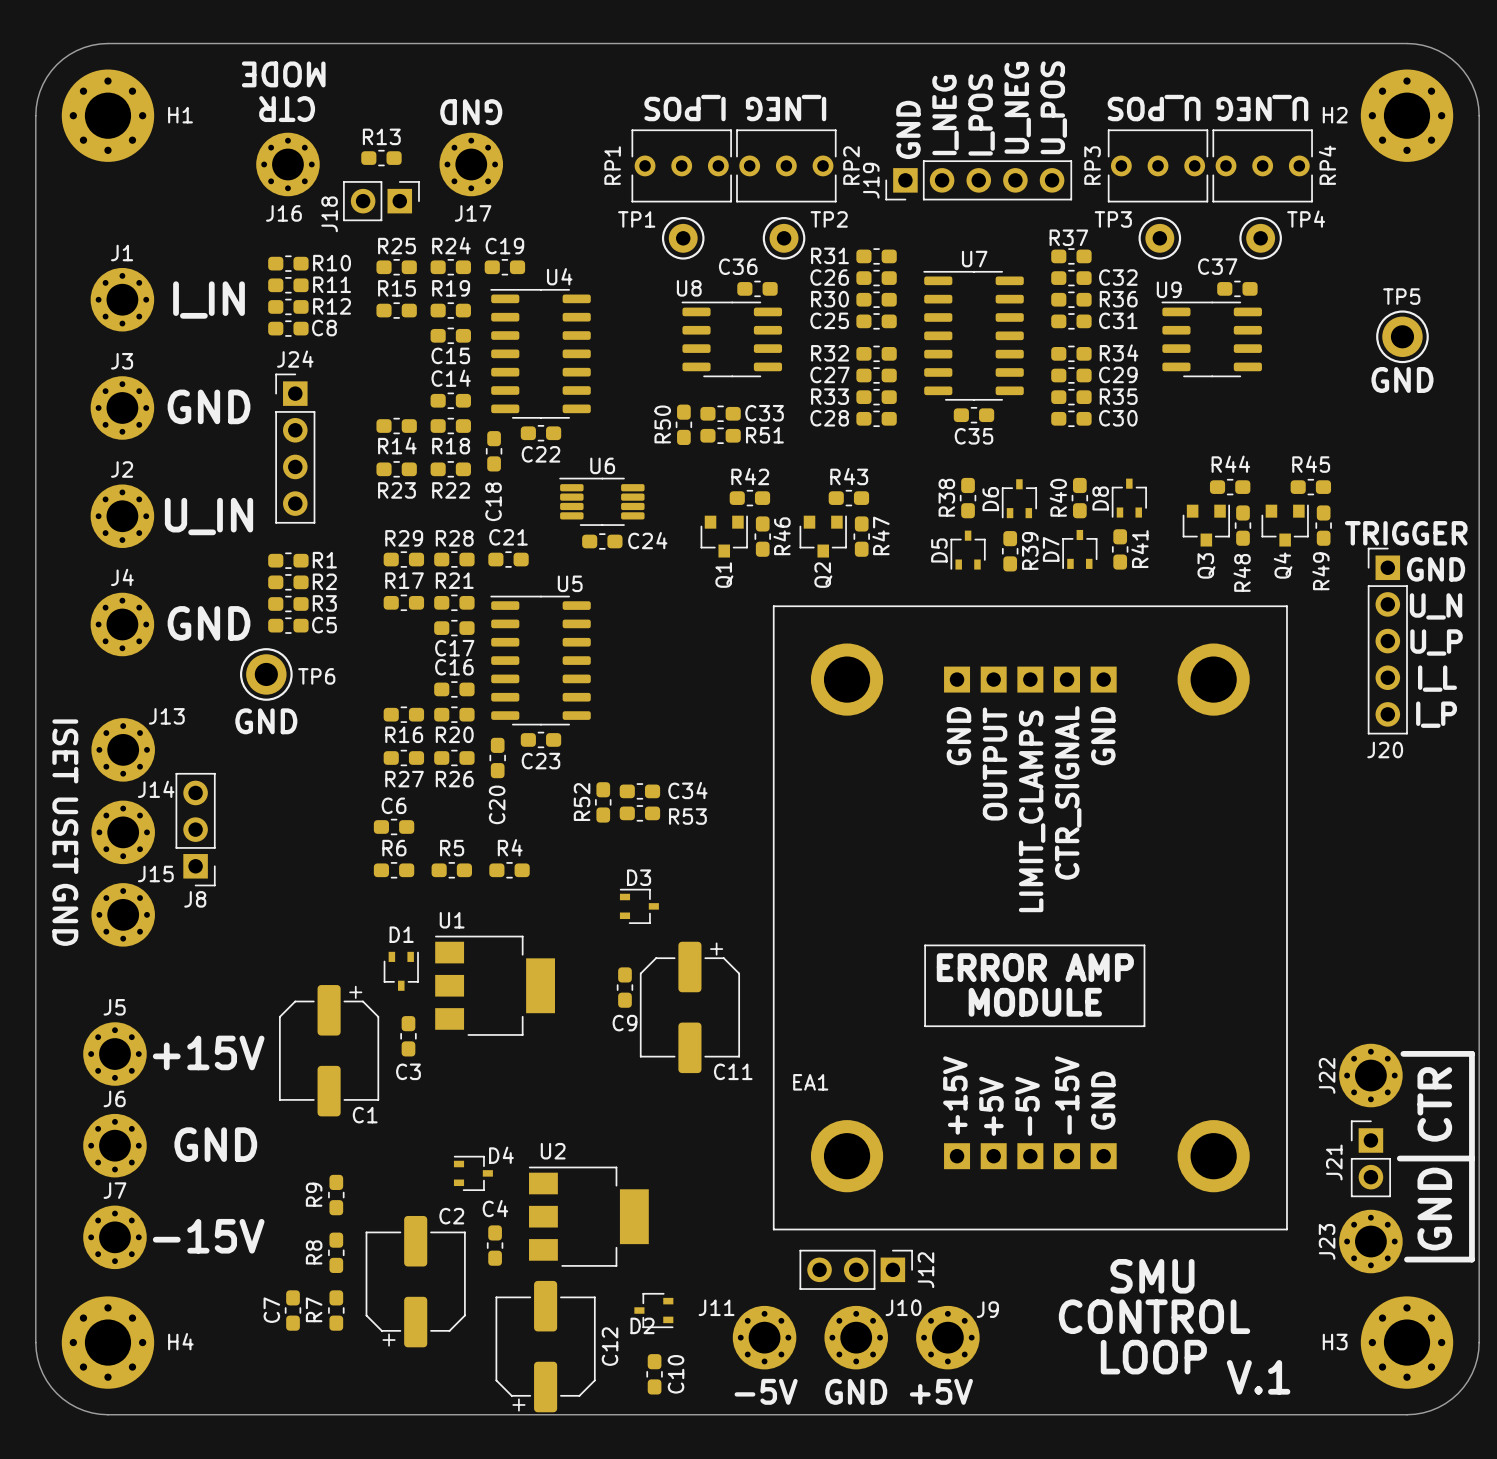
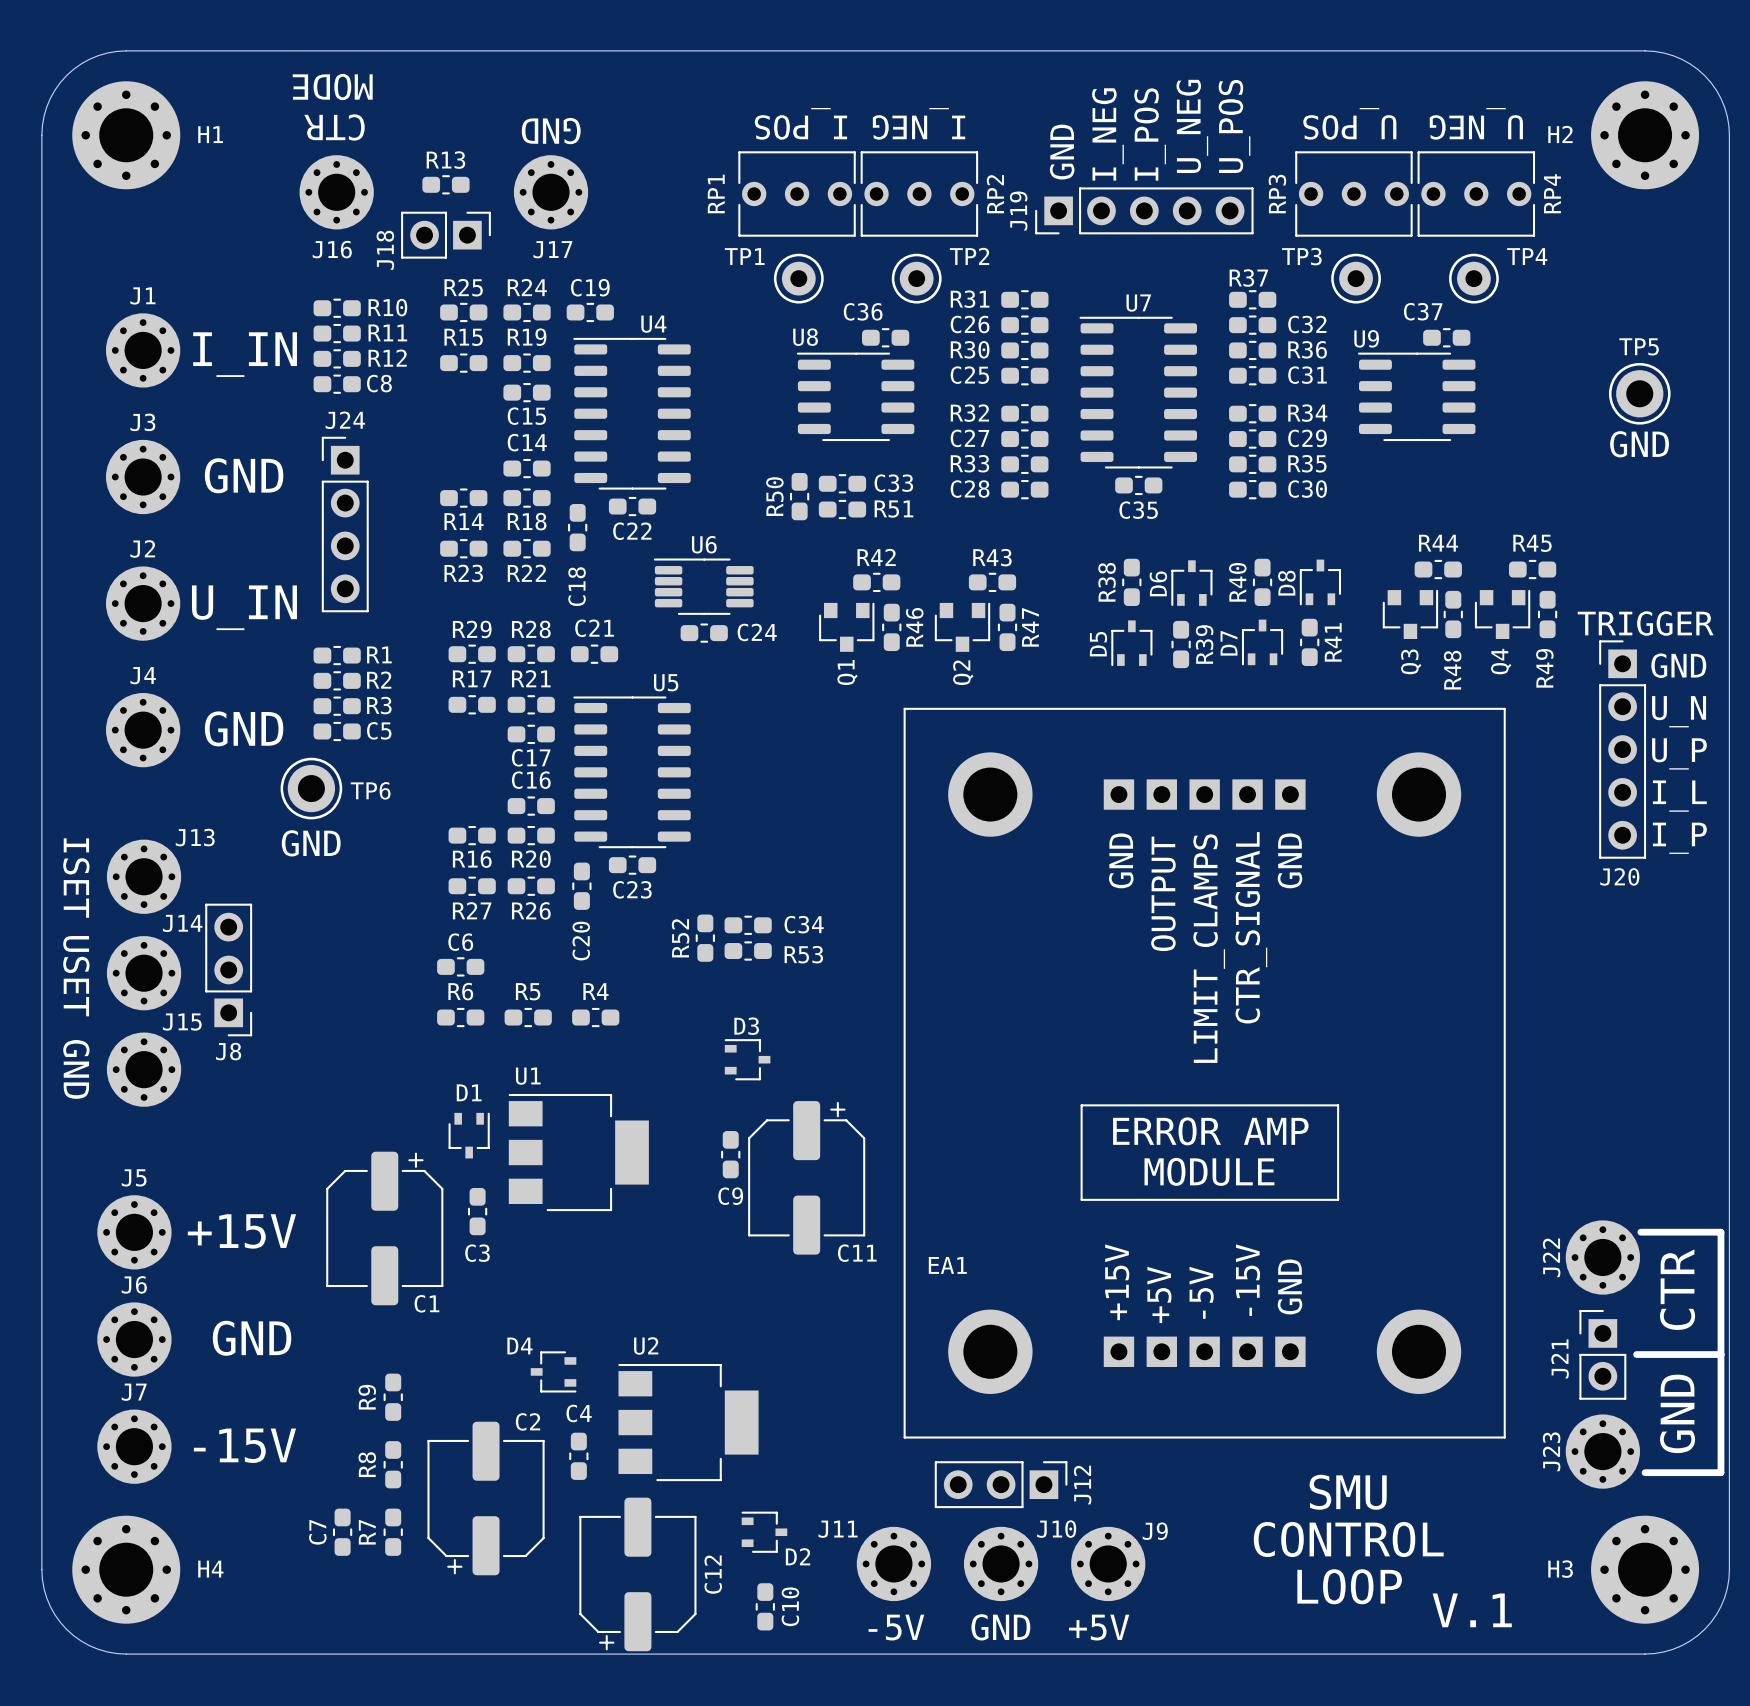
D4 name position: D4 (501, 1155) -> D4 (520, 1345)
D4 rotation: 0° (473, 1173) -> 180° (553, 1371)
D2 rotation: 0° (653, 1310) -> 180° (764, 1532)
D2 name position: D2 (642, 1325) -> D2 (798, 1556)

